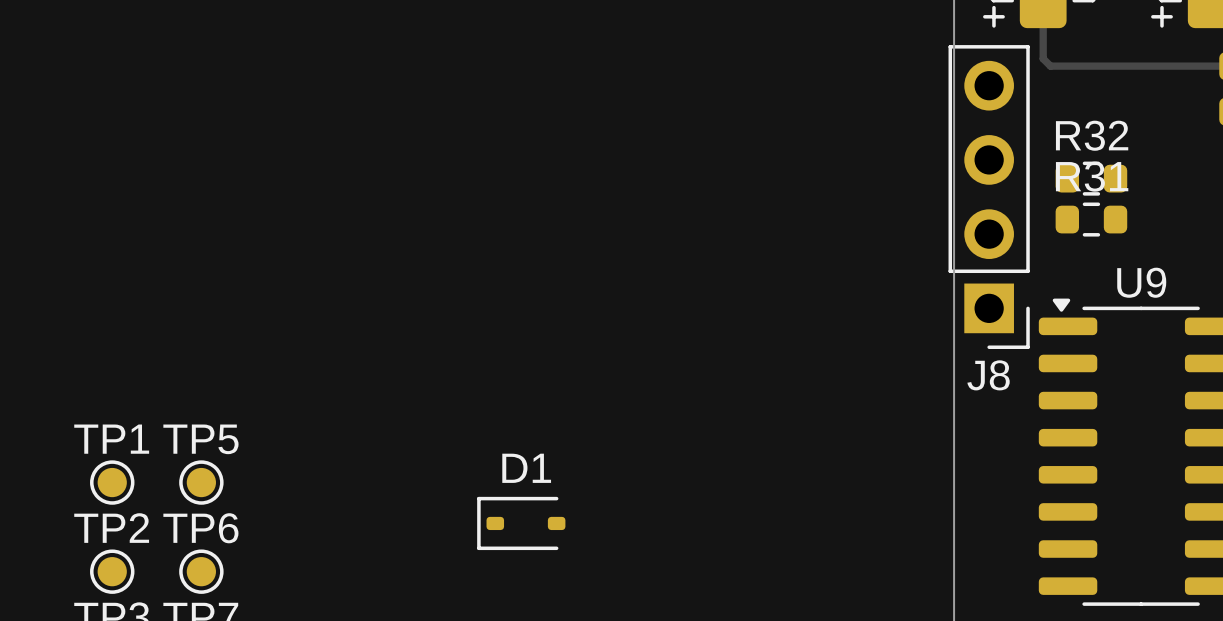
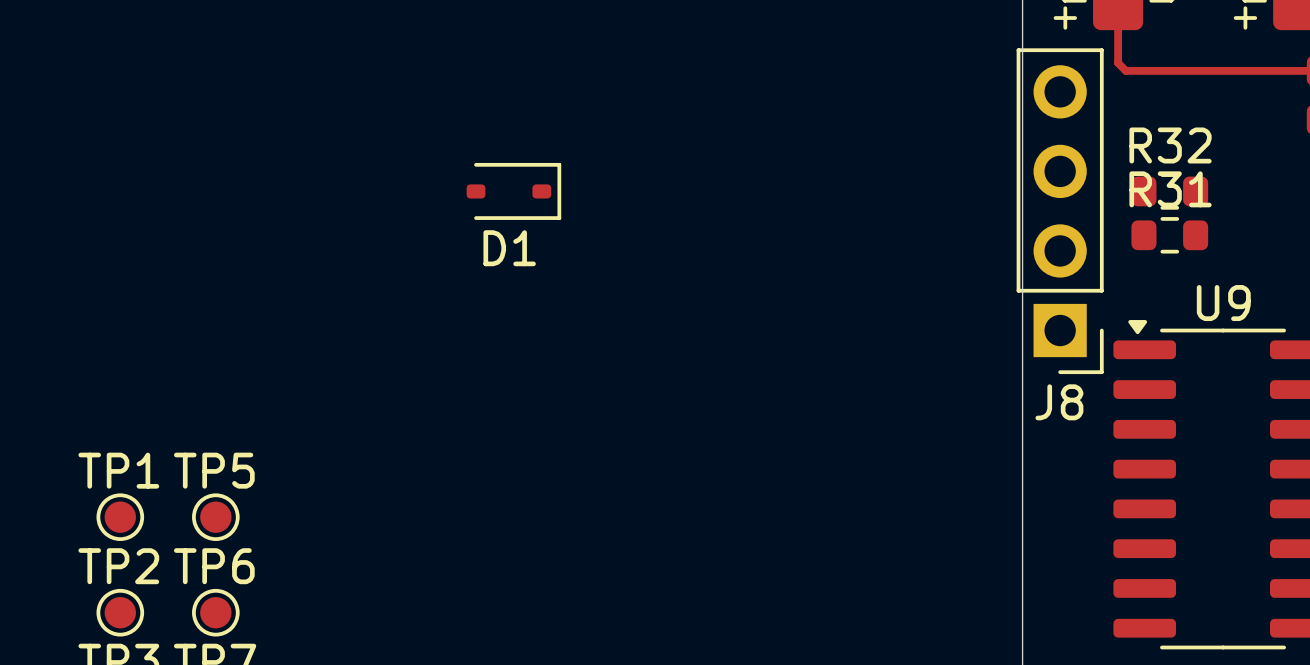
D1 rotation: 0° (521, 523) -> 180° (513, 191)
D1 position: (521, 523) -> (513, 191)

